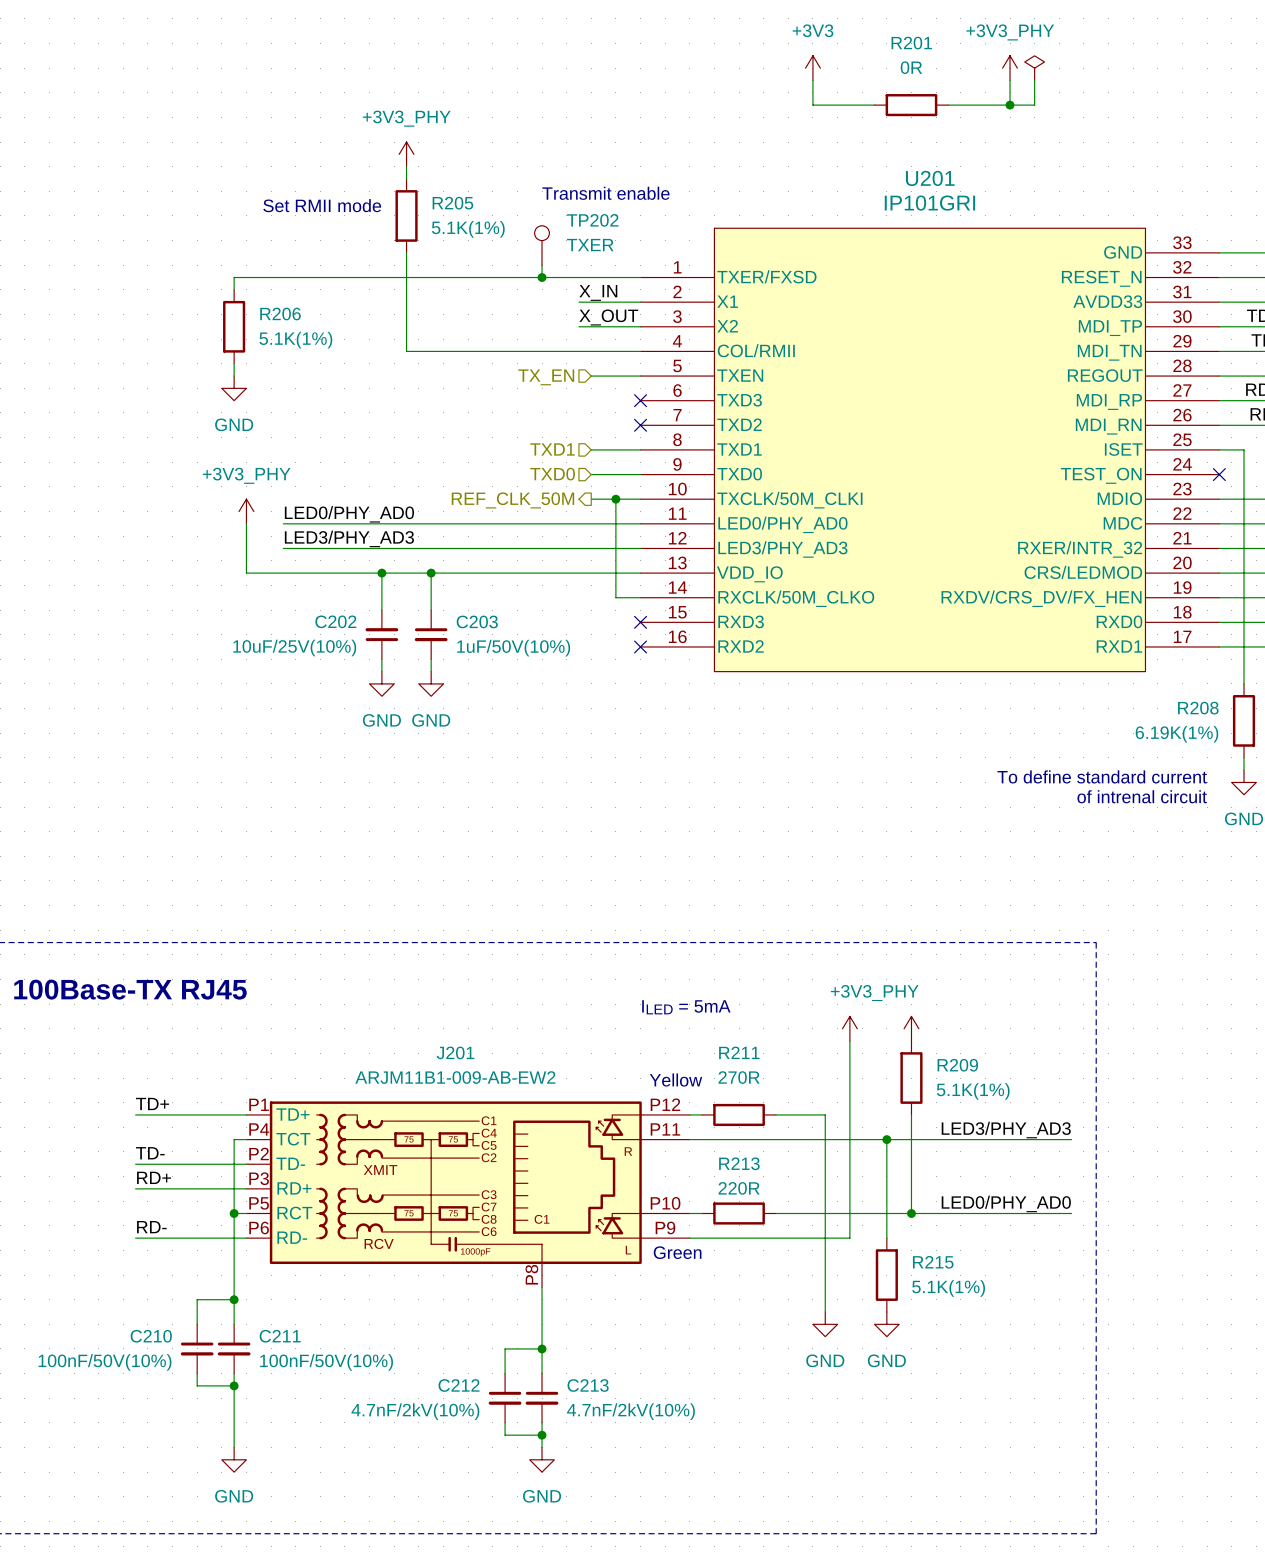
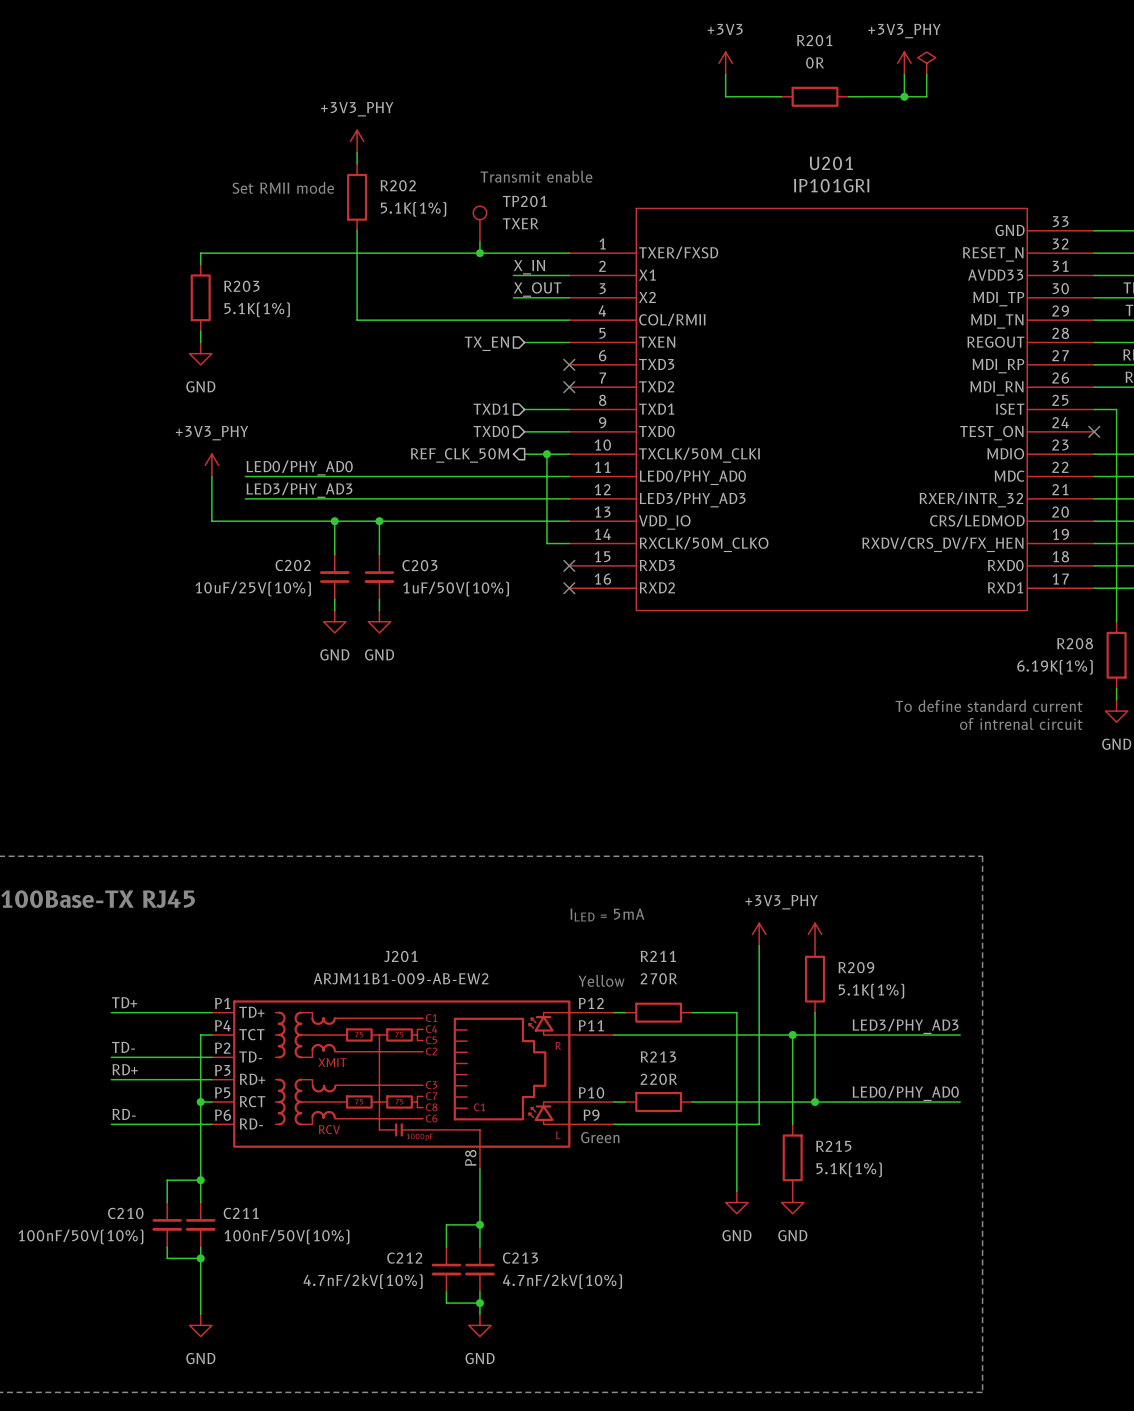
R205 name: R205 (452, 203) -> R202 (398, 185)
TP202 name: TP202 (592, 220) -> TP201 (524, 201)
R206 name: R206 (280, 314) -> R203 (241, 286)

